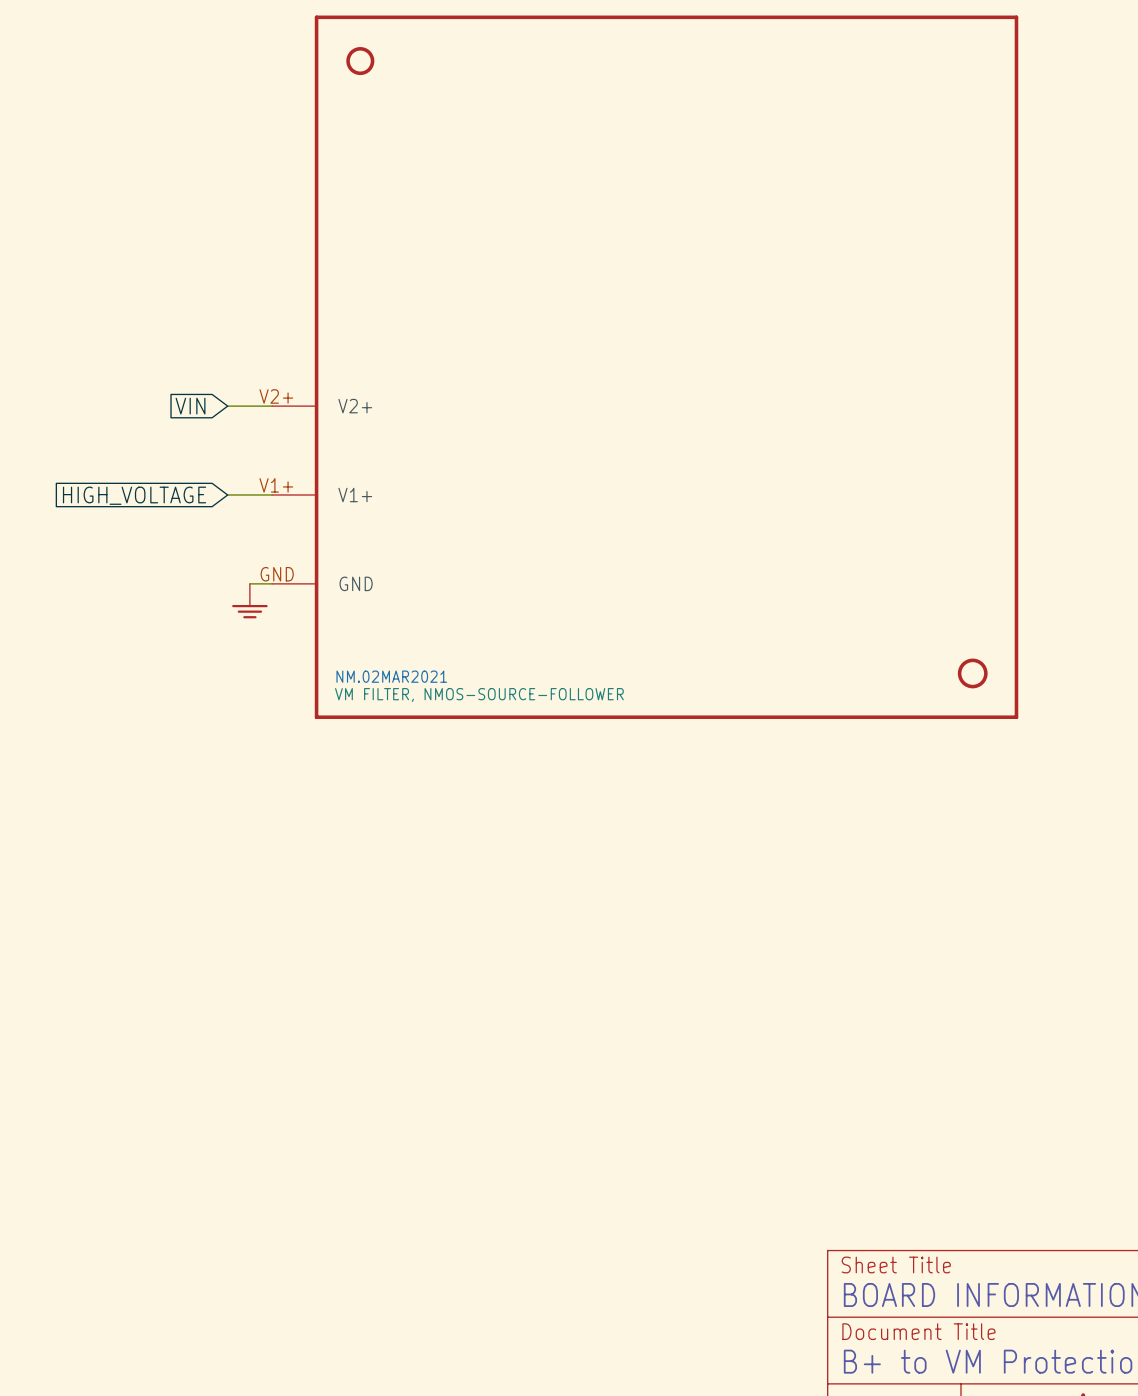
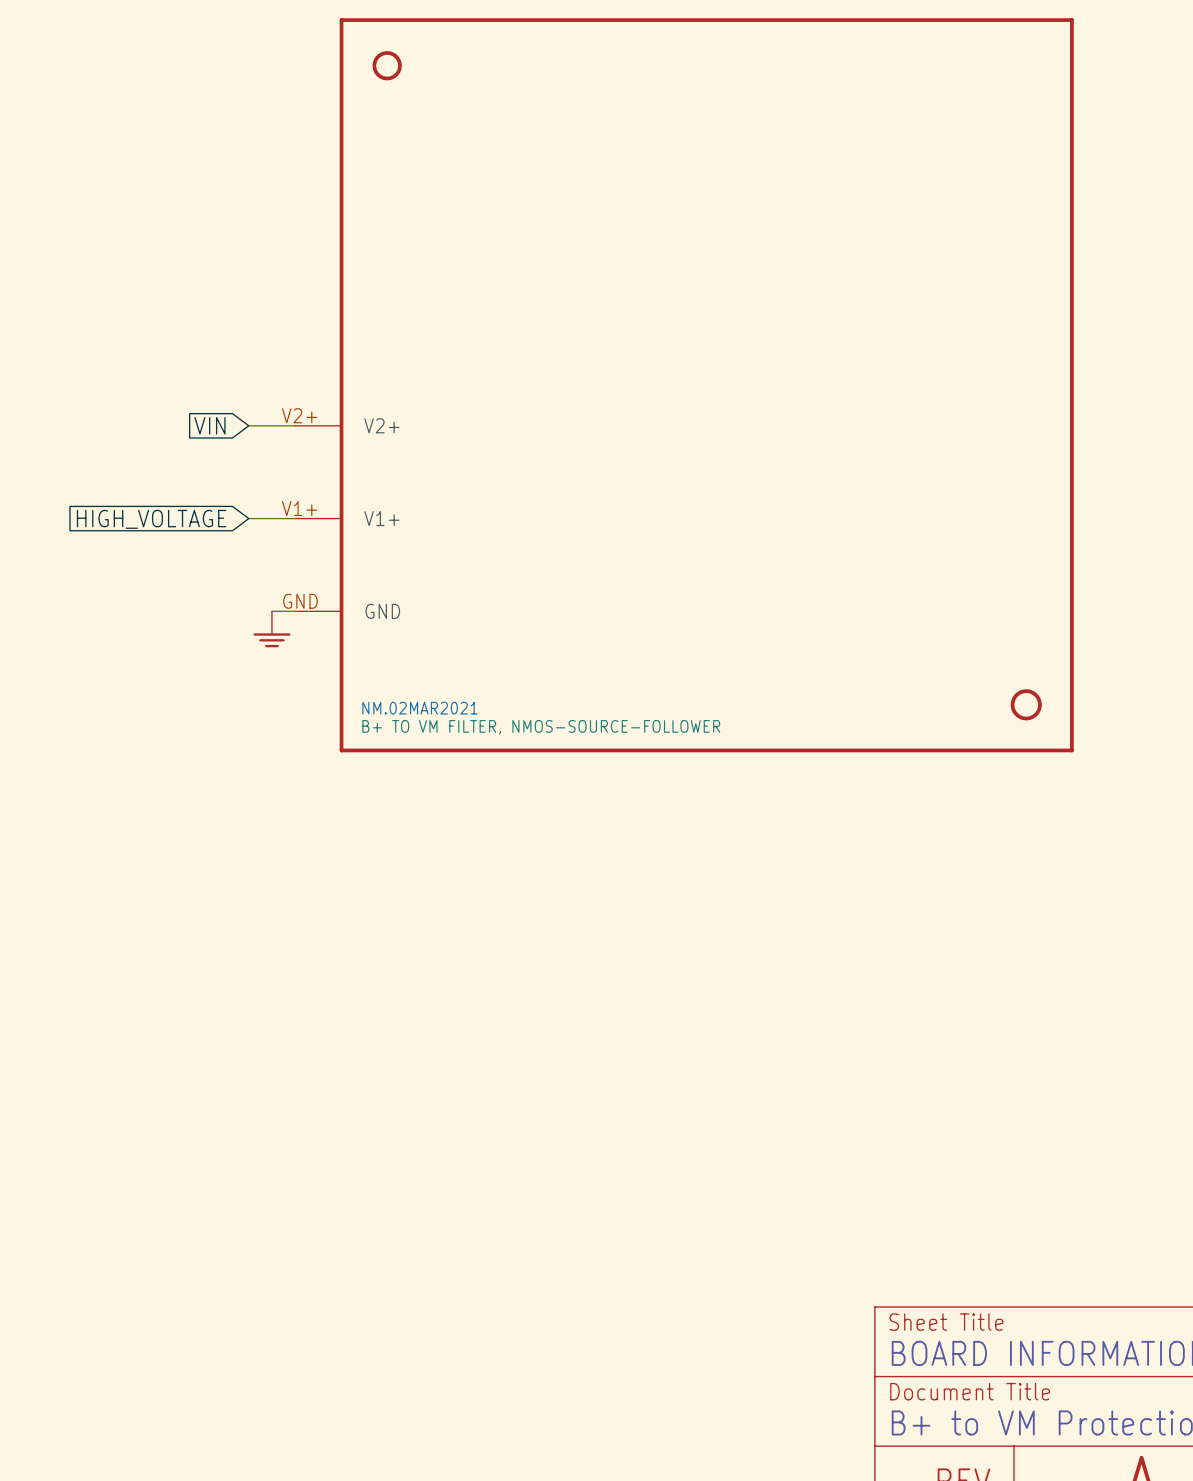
NM.02MAR2021 value: VM FILTER, NMOS-SOURCE-FOLLOWER (479, 694) -> B+ TO VM FILTER, NMOS-SOURCE-FOLLOWER (541, 727)

